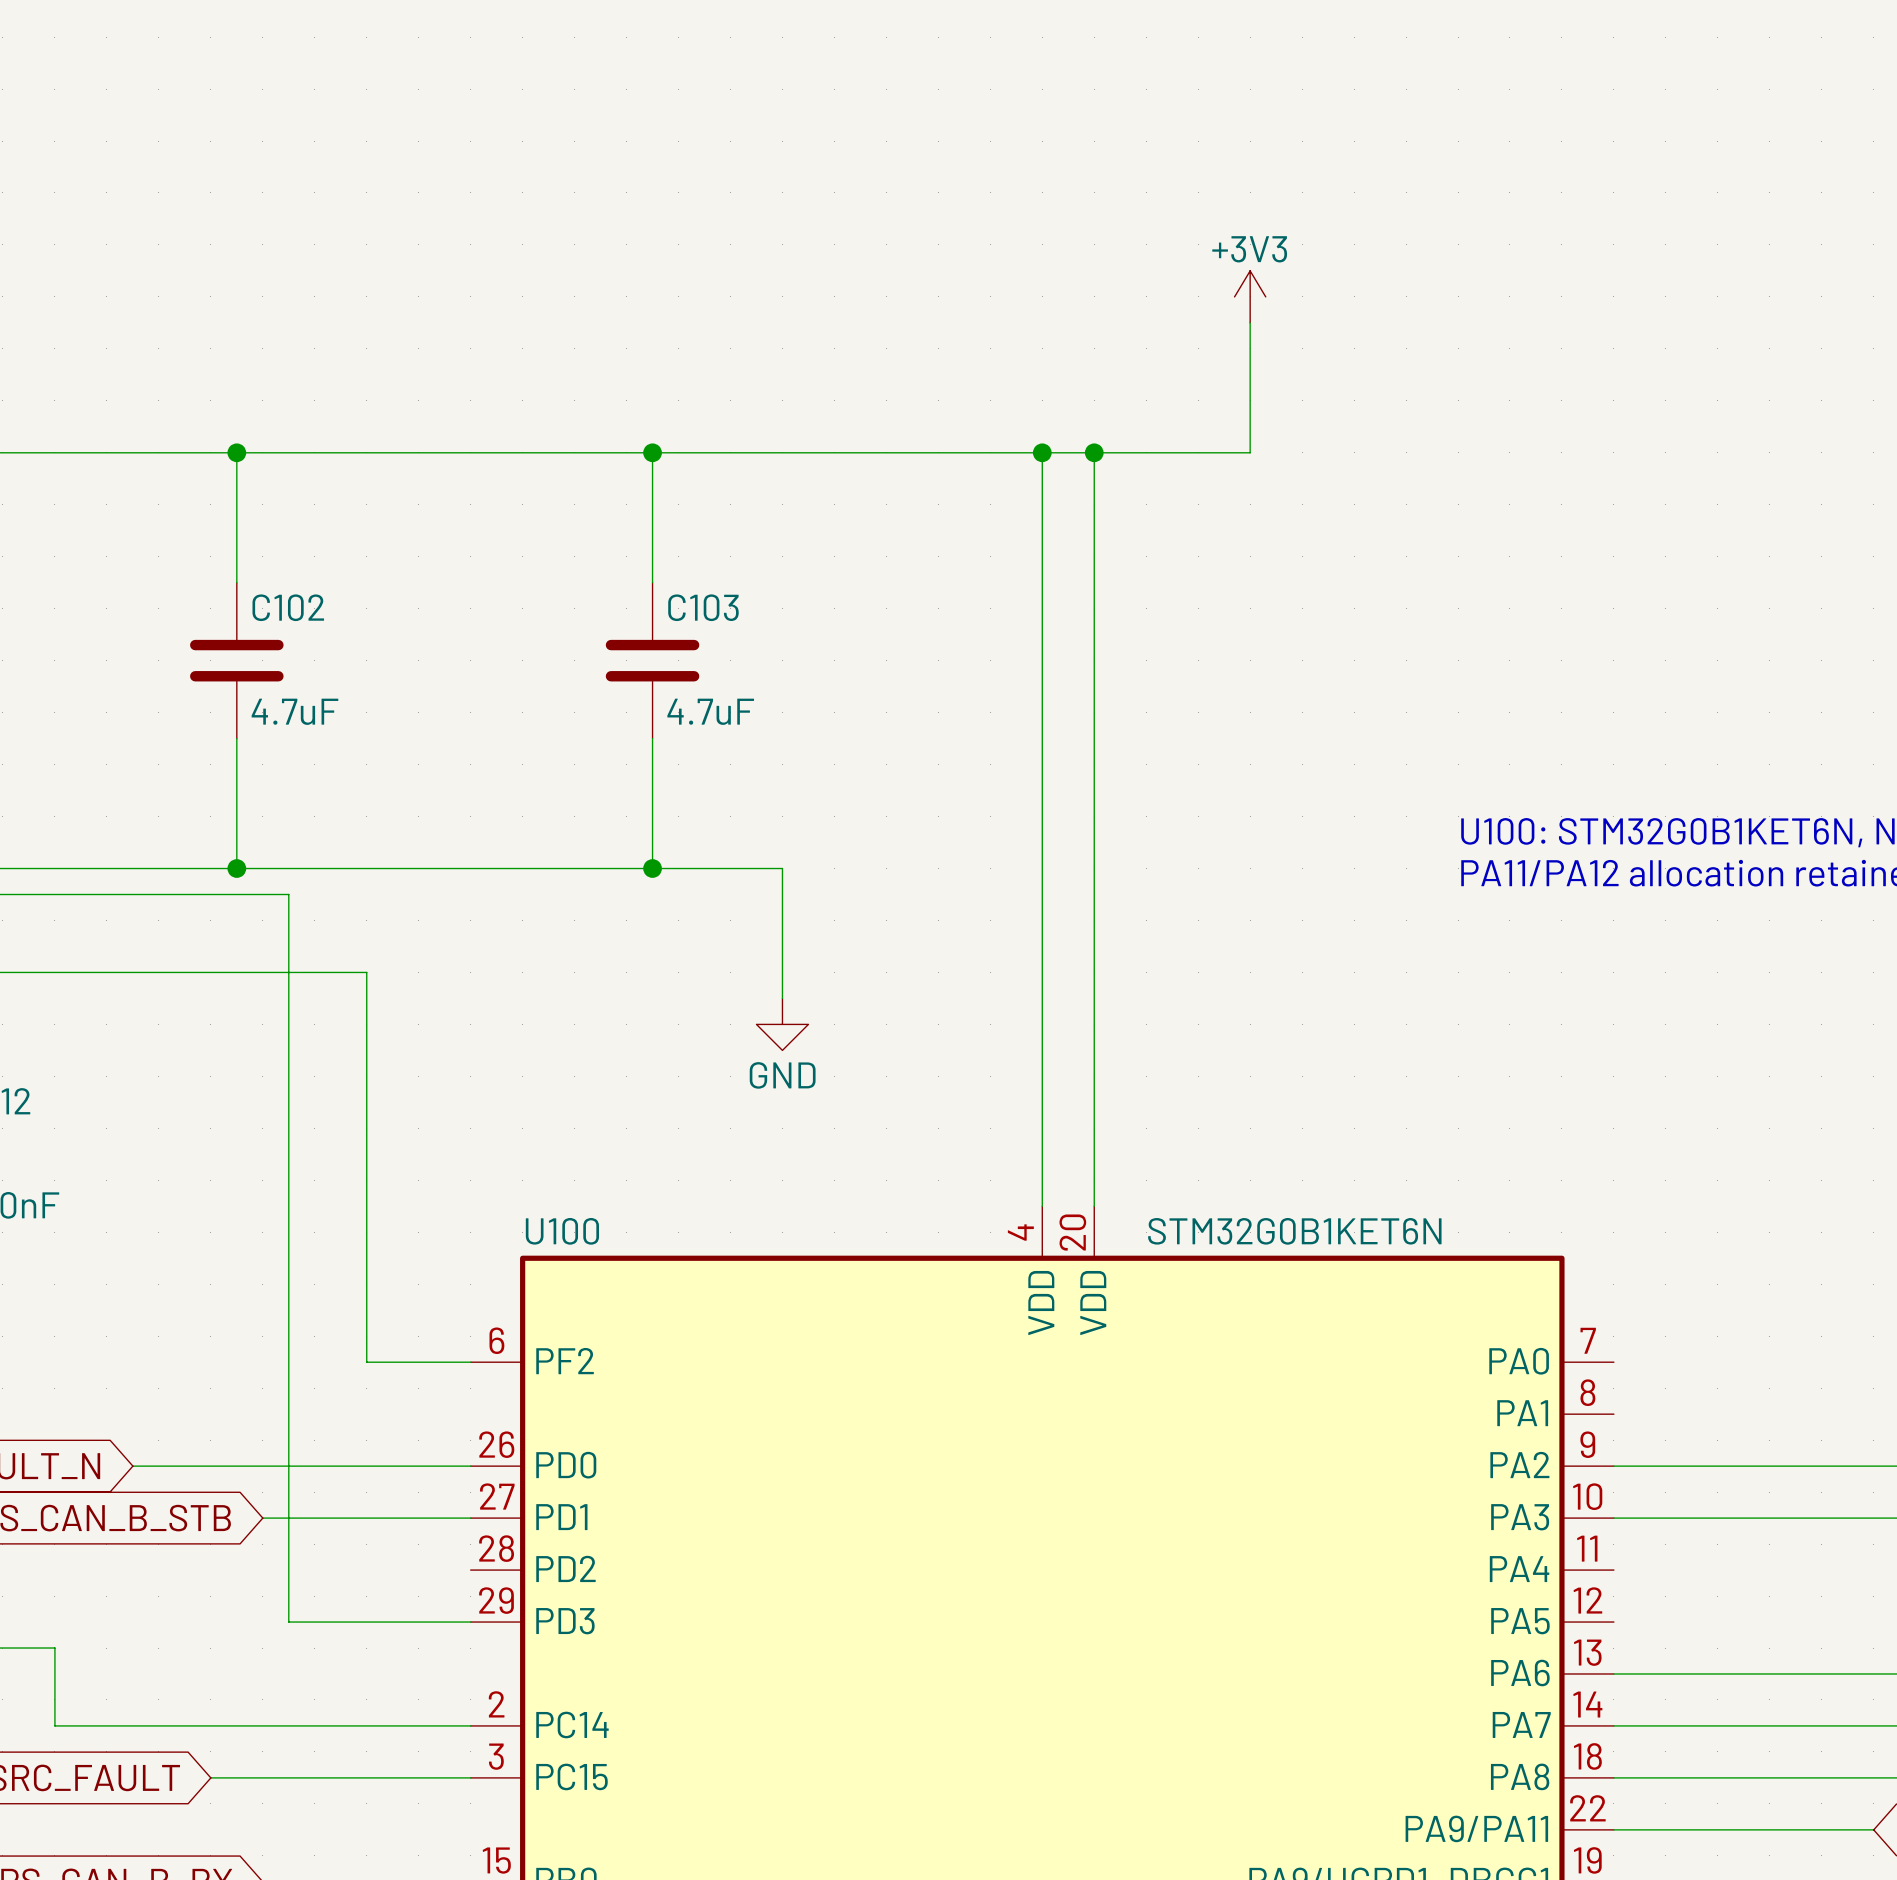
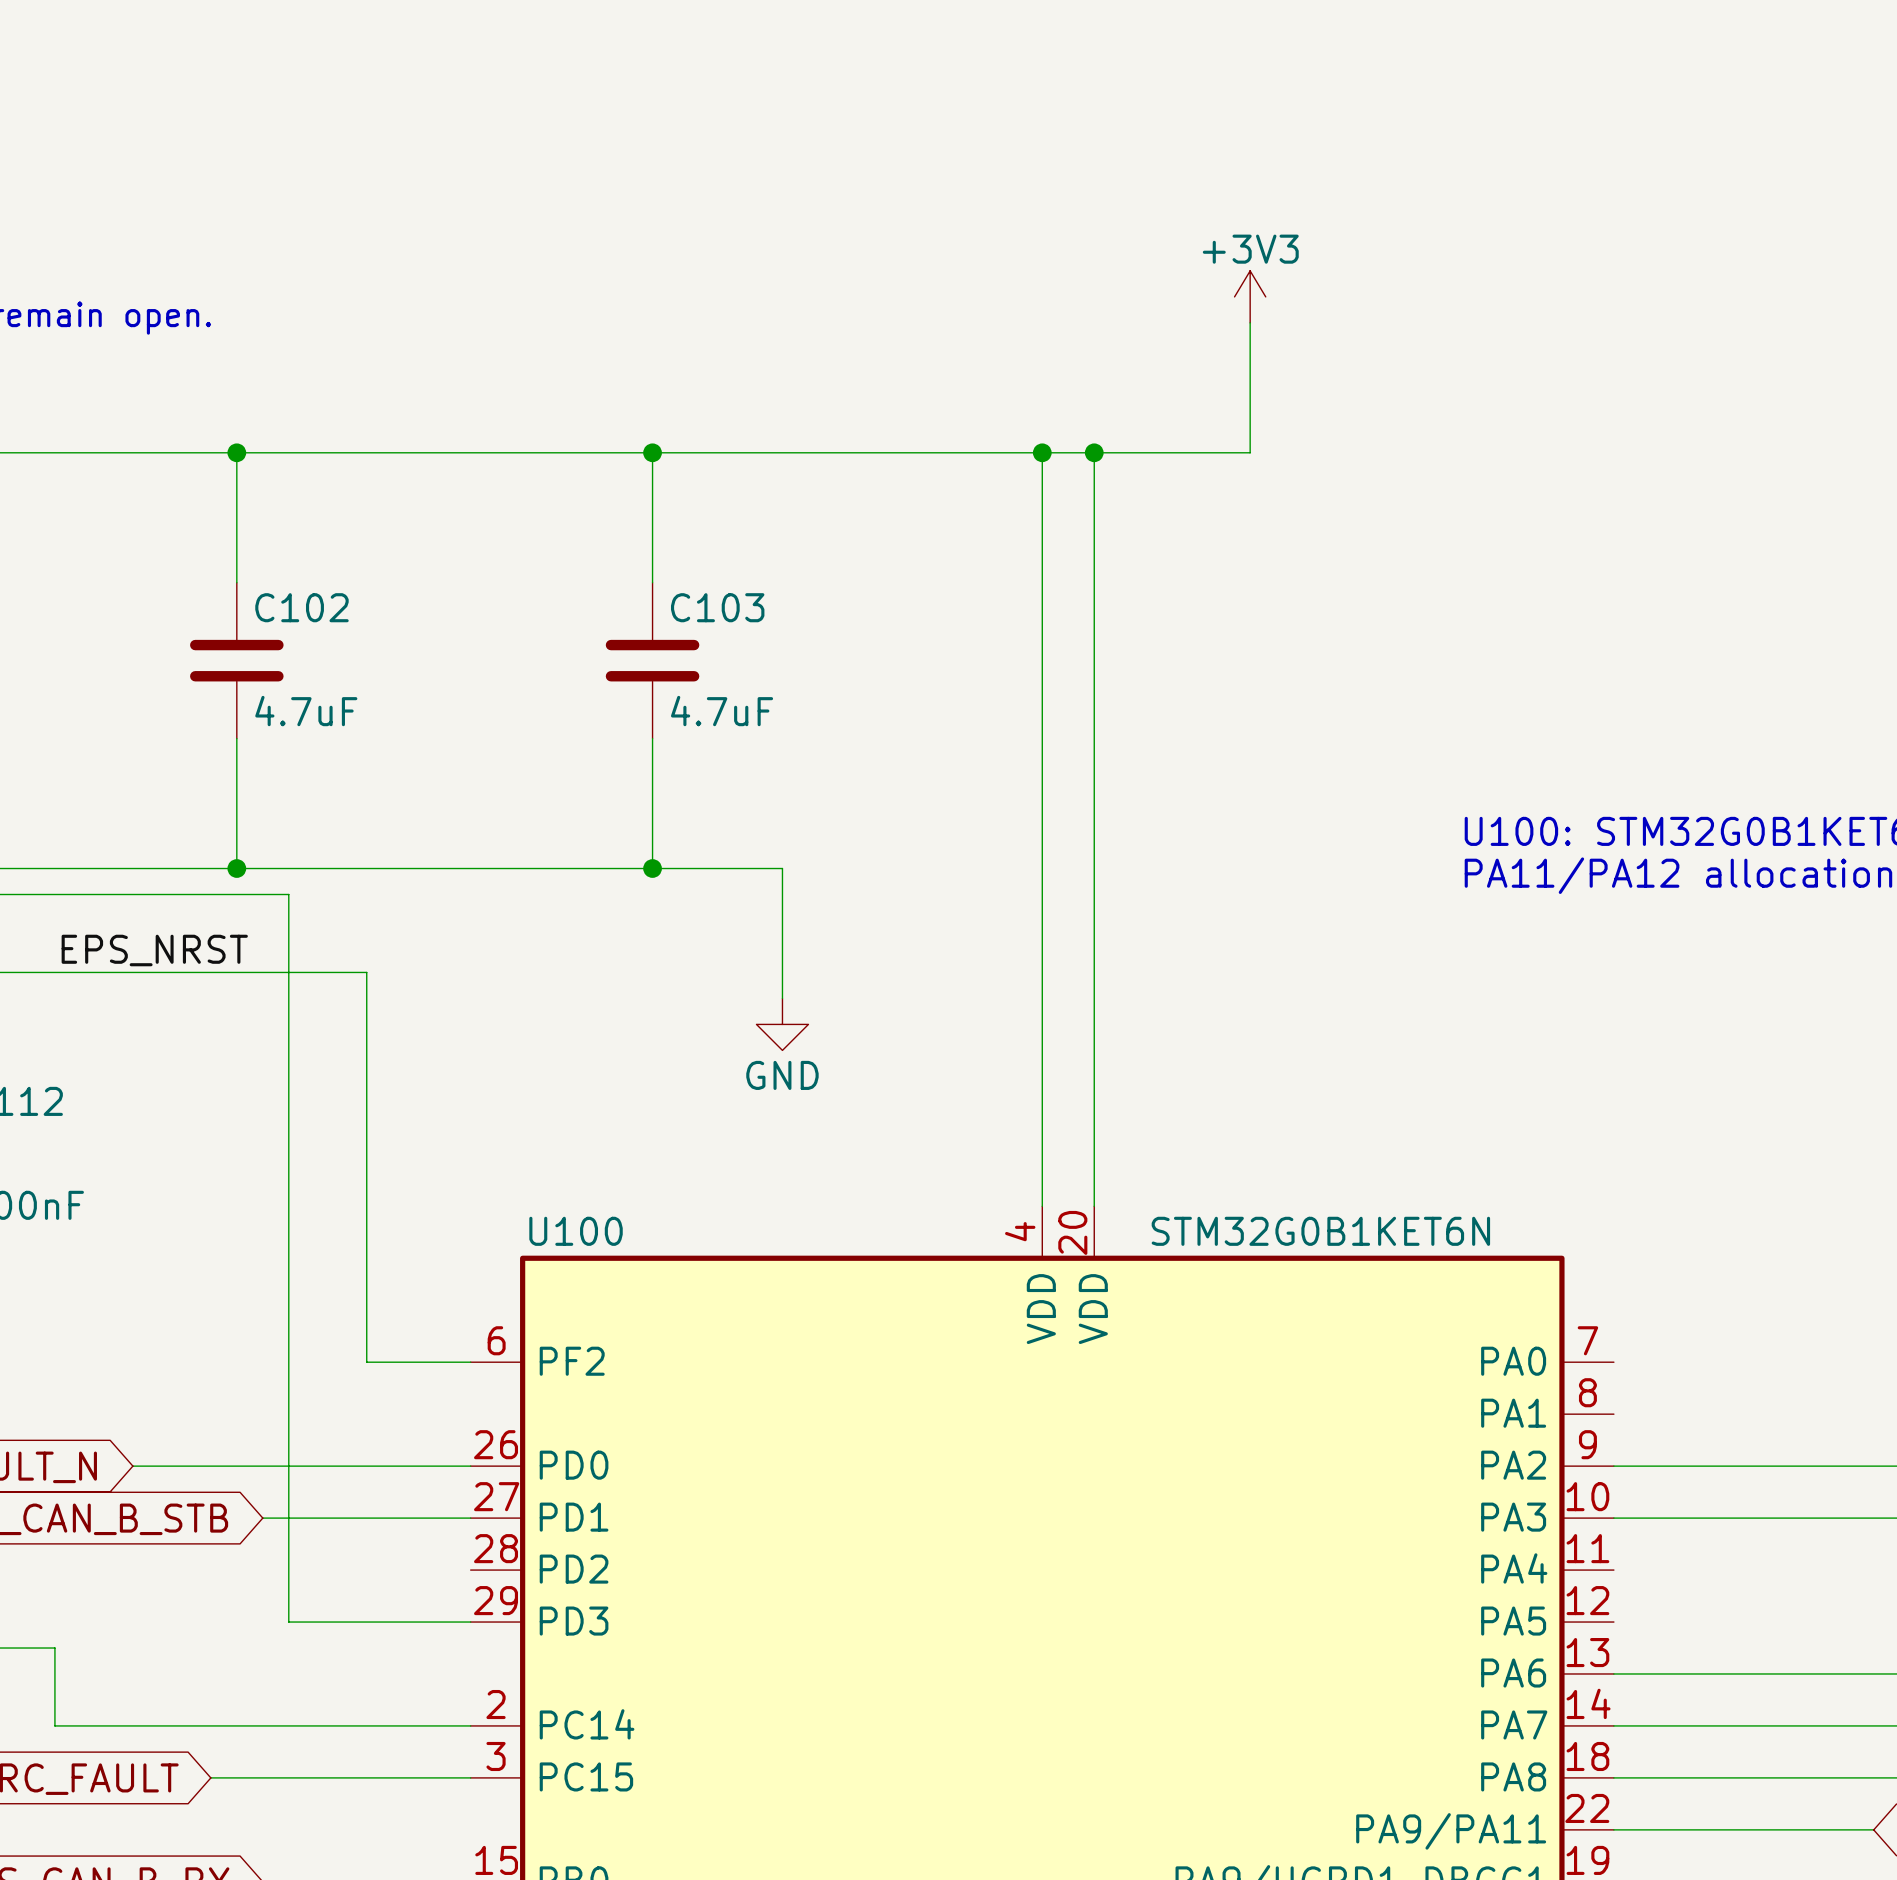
label: none -> EPS_NRST (154, 950)

